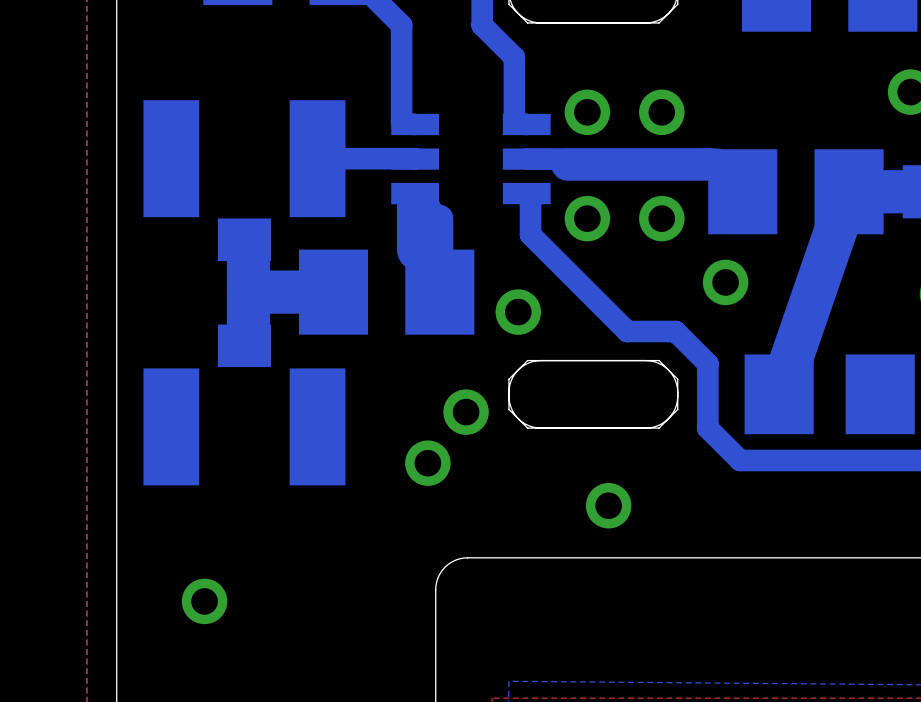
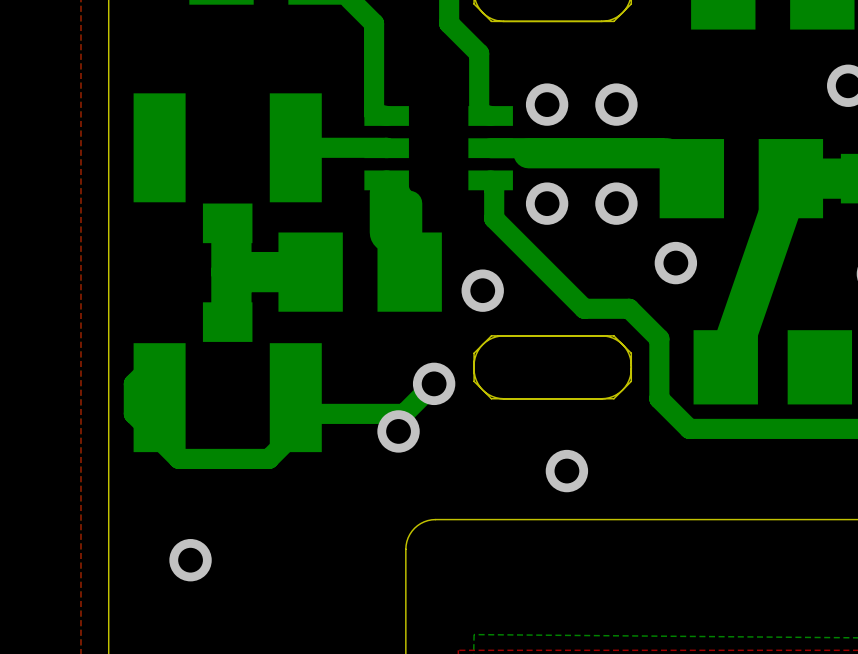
bottom track: none -> (159, 368) (148, 368) (133, 383) (133, 413) (178, 458) (268, 458) (314, 413) (404, 413) (434, 383)

